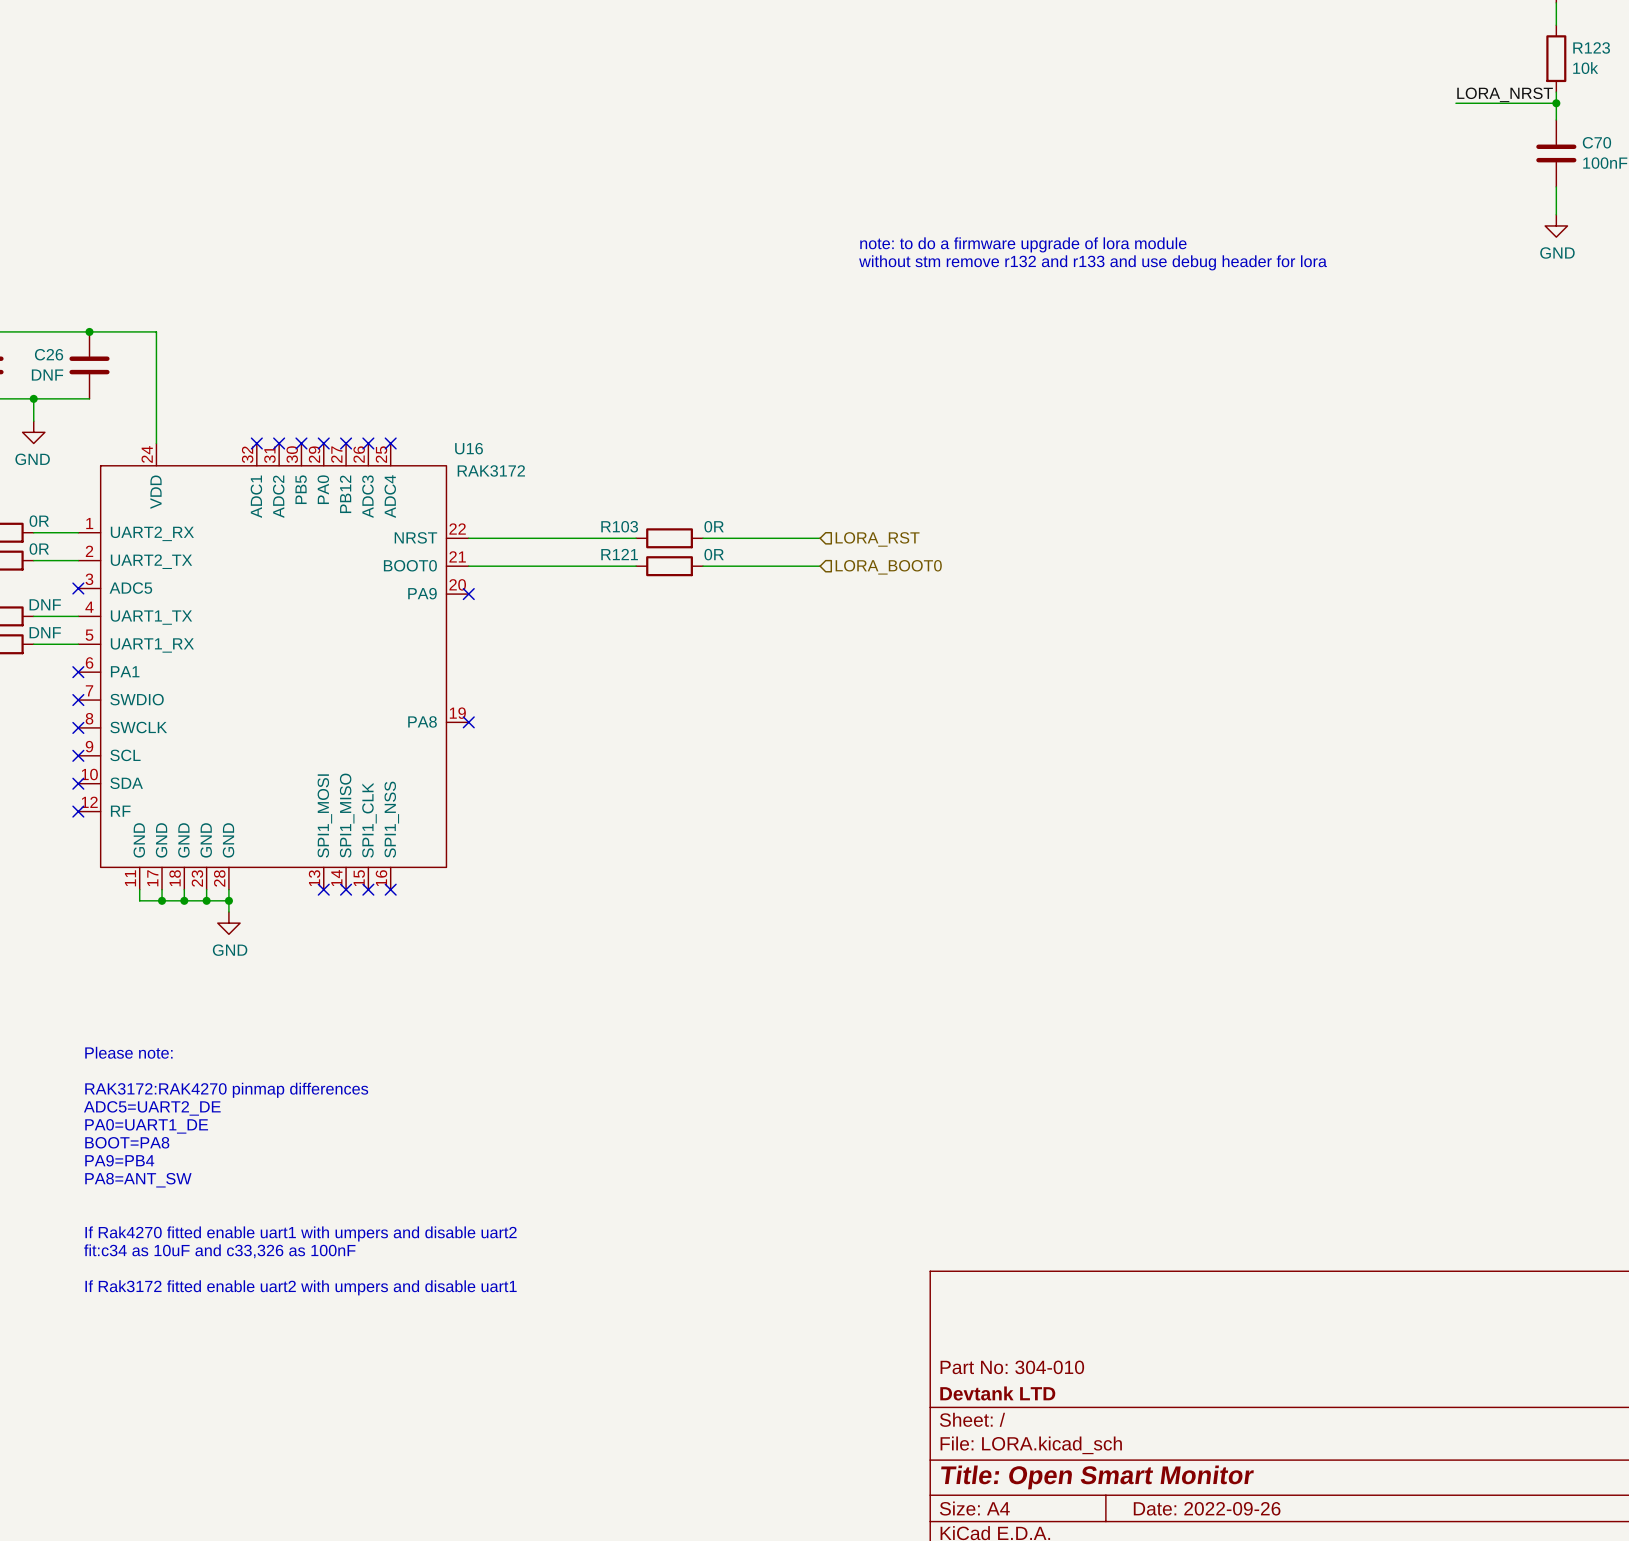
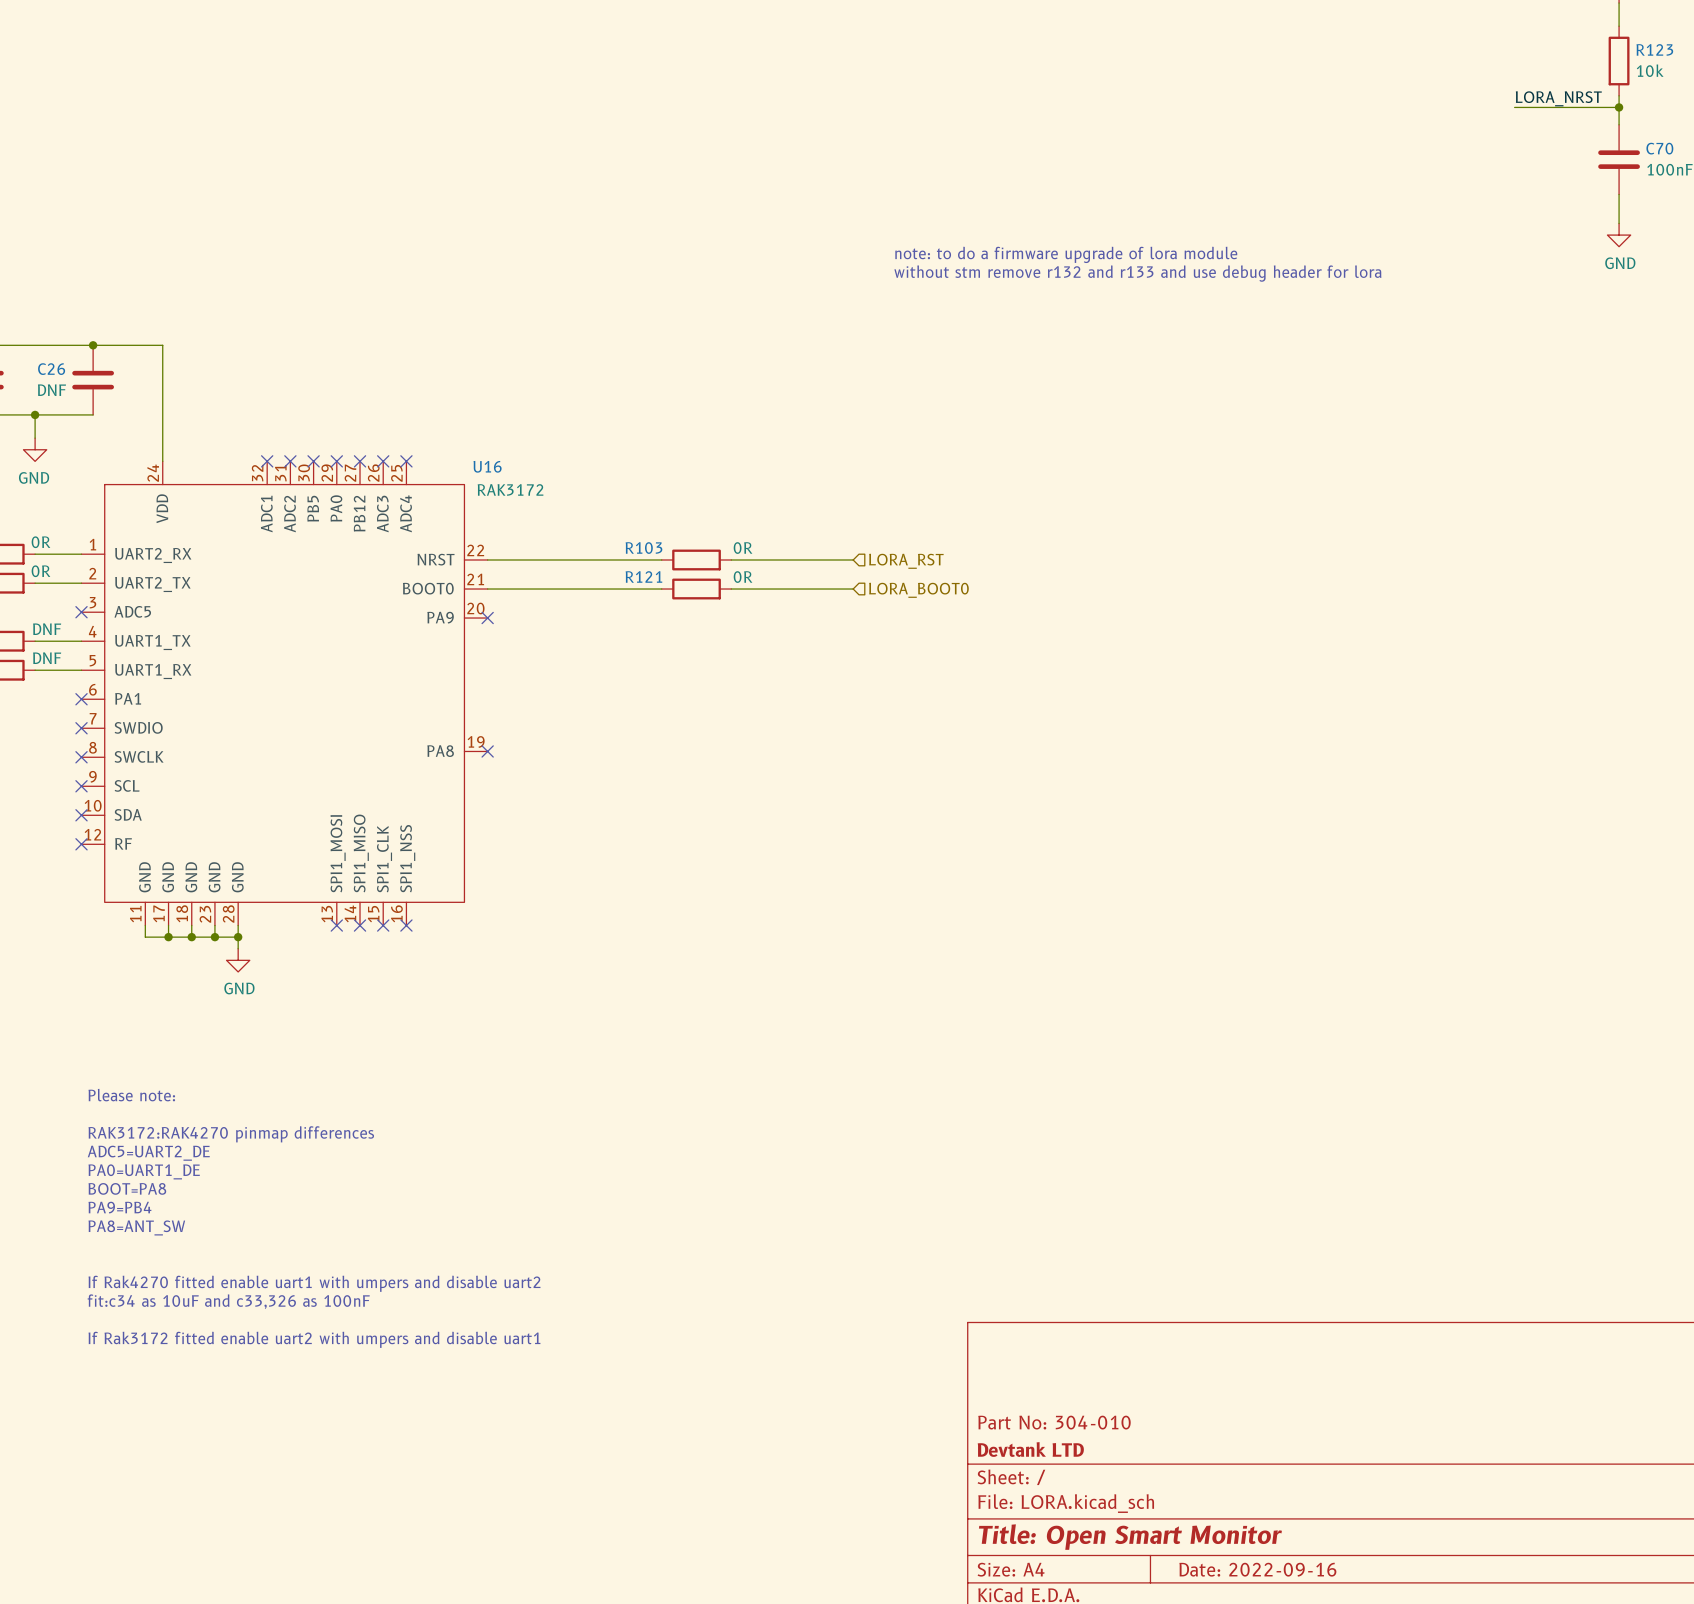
title block: Date: 2022-09-26 (1207, 1508) -> Date: 2022-09-16 (1257, 1569)

